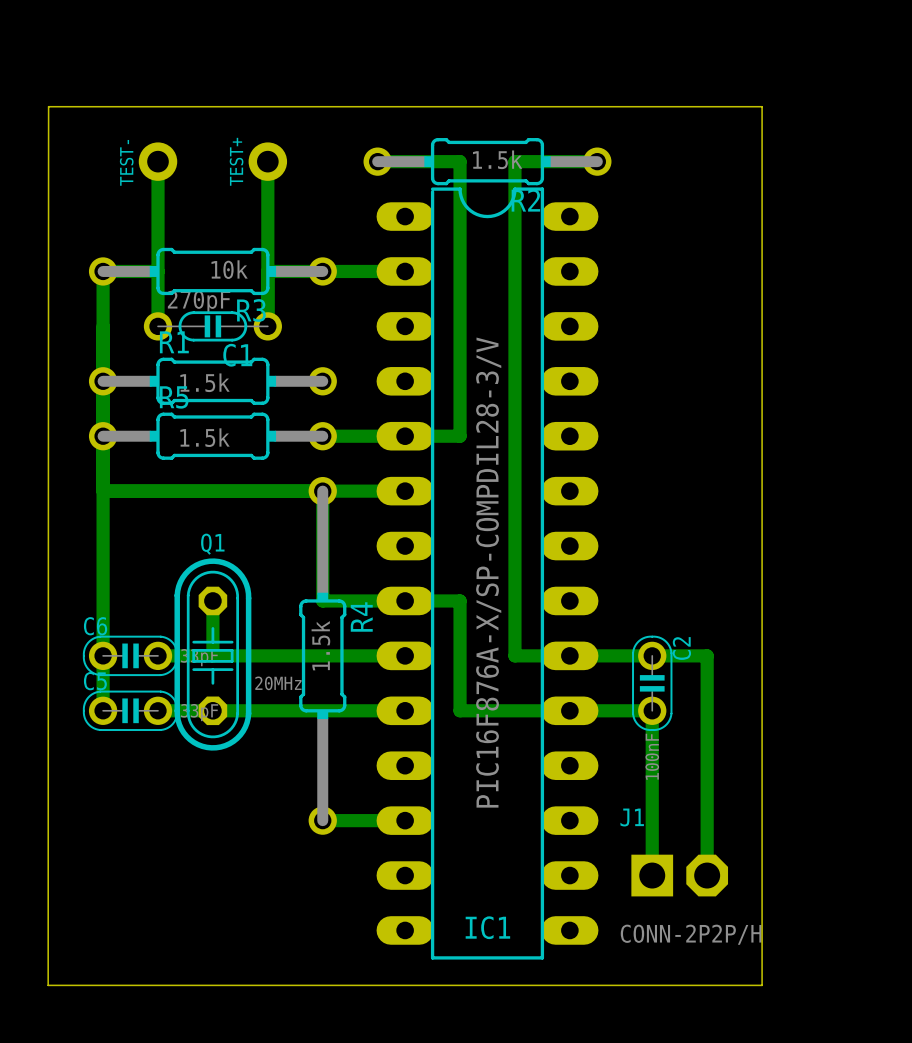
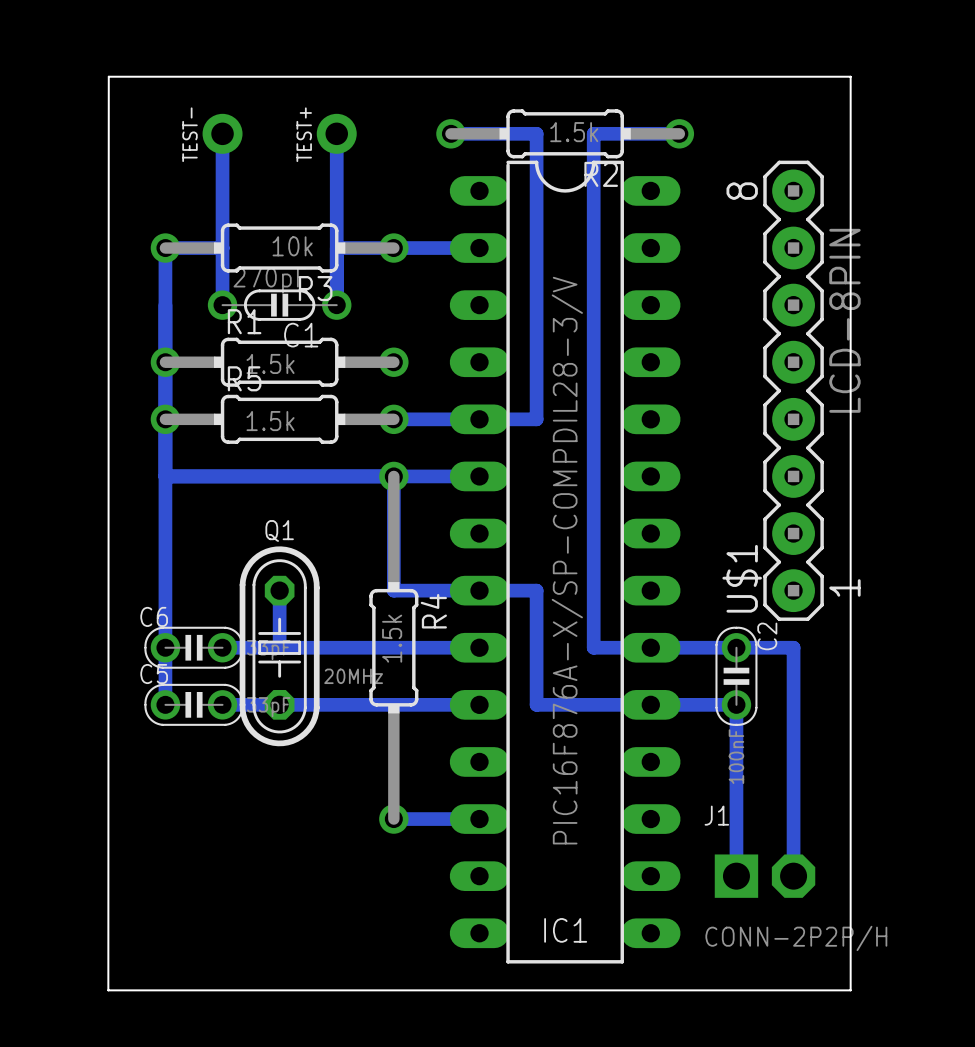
U$1: none -> LCD-8PIN (793, 390)

